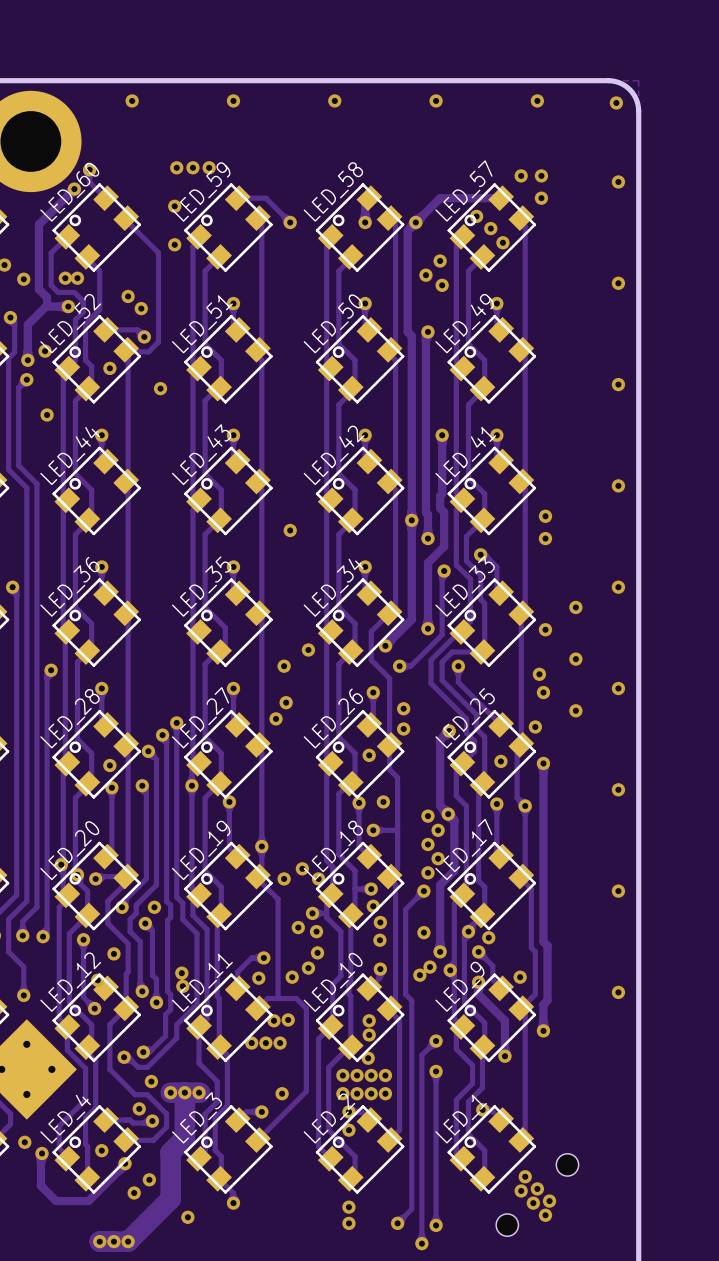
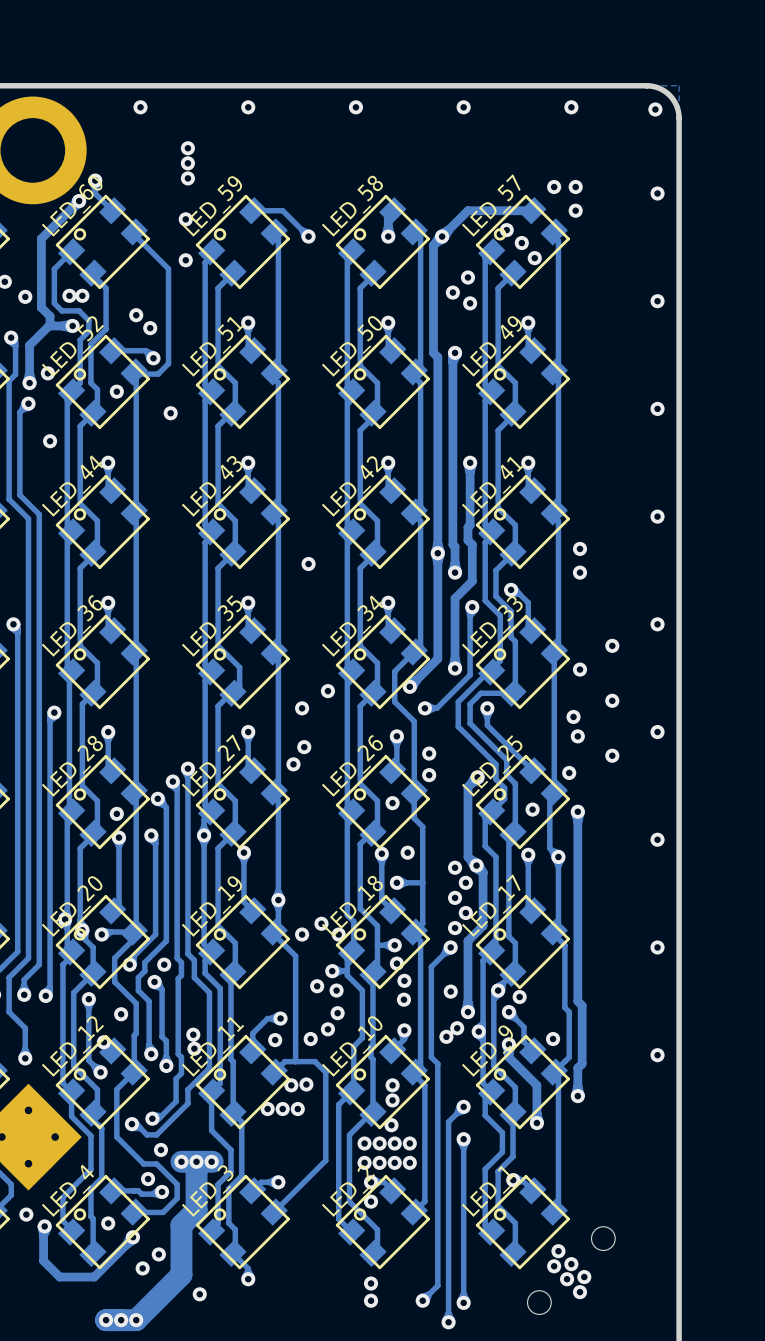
via: none -> (187, 148)
via: none -> (187, 163)
via: (192, 167) -> none
via: (209, 167) -> none
via: (282, 1093) -> none

